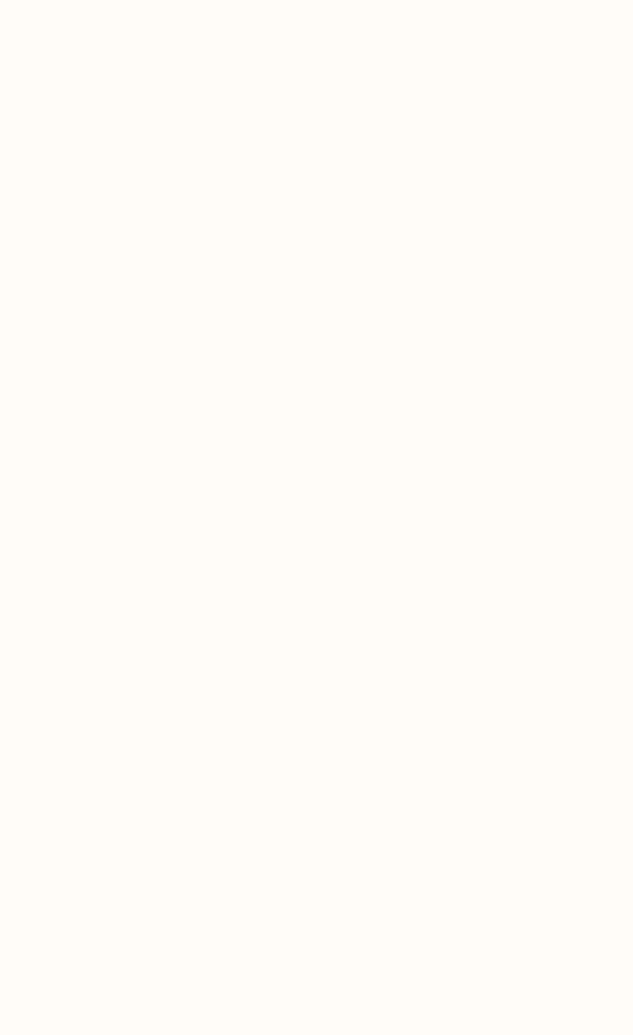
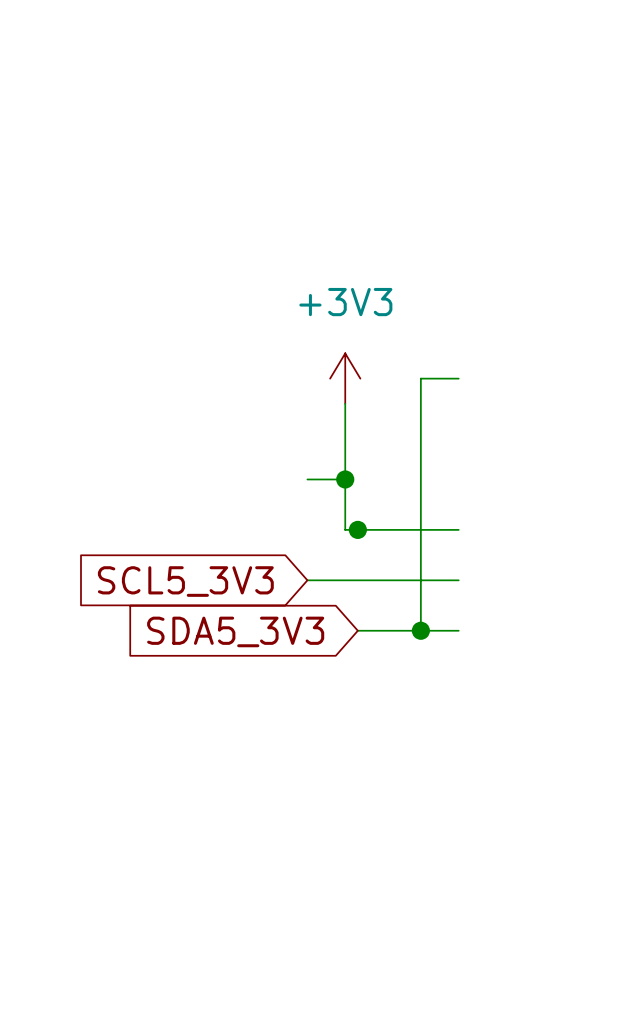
power symbol: none -> +3V3 (345, 378)
wire: none -> (458, 378) (420, 378) (420, 630)
wire: none -> (345, 403) (345, 529) (458, 529)
wire: none -> (307, 479) (345, 479)
junction: none -> (345, 479)
junction: none -> (357, 529)
wire: none -> (307, 580) (458, 580)
global label: none -> SCL5_3V3 (185, 581)
wire: none -> (357, 630) (458, 630)
junction: none -> (420, 630)
global label: none -> SDA5_3V3 (235, 631)

